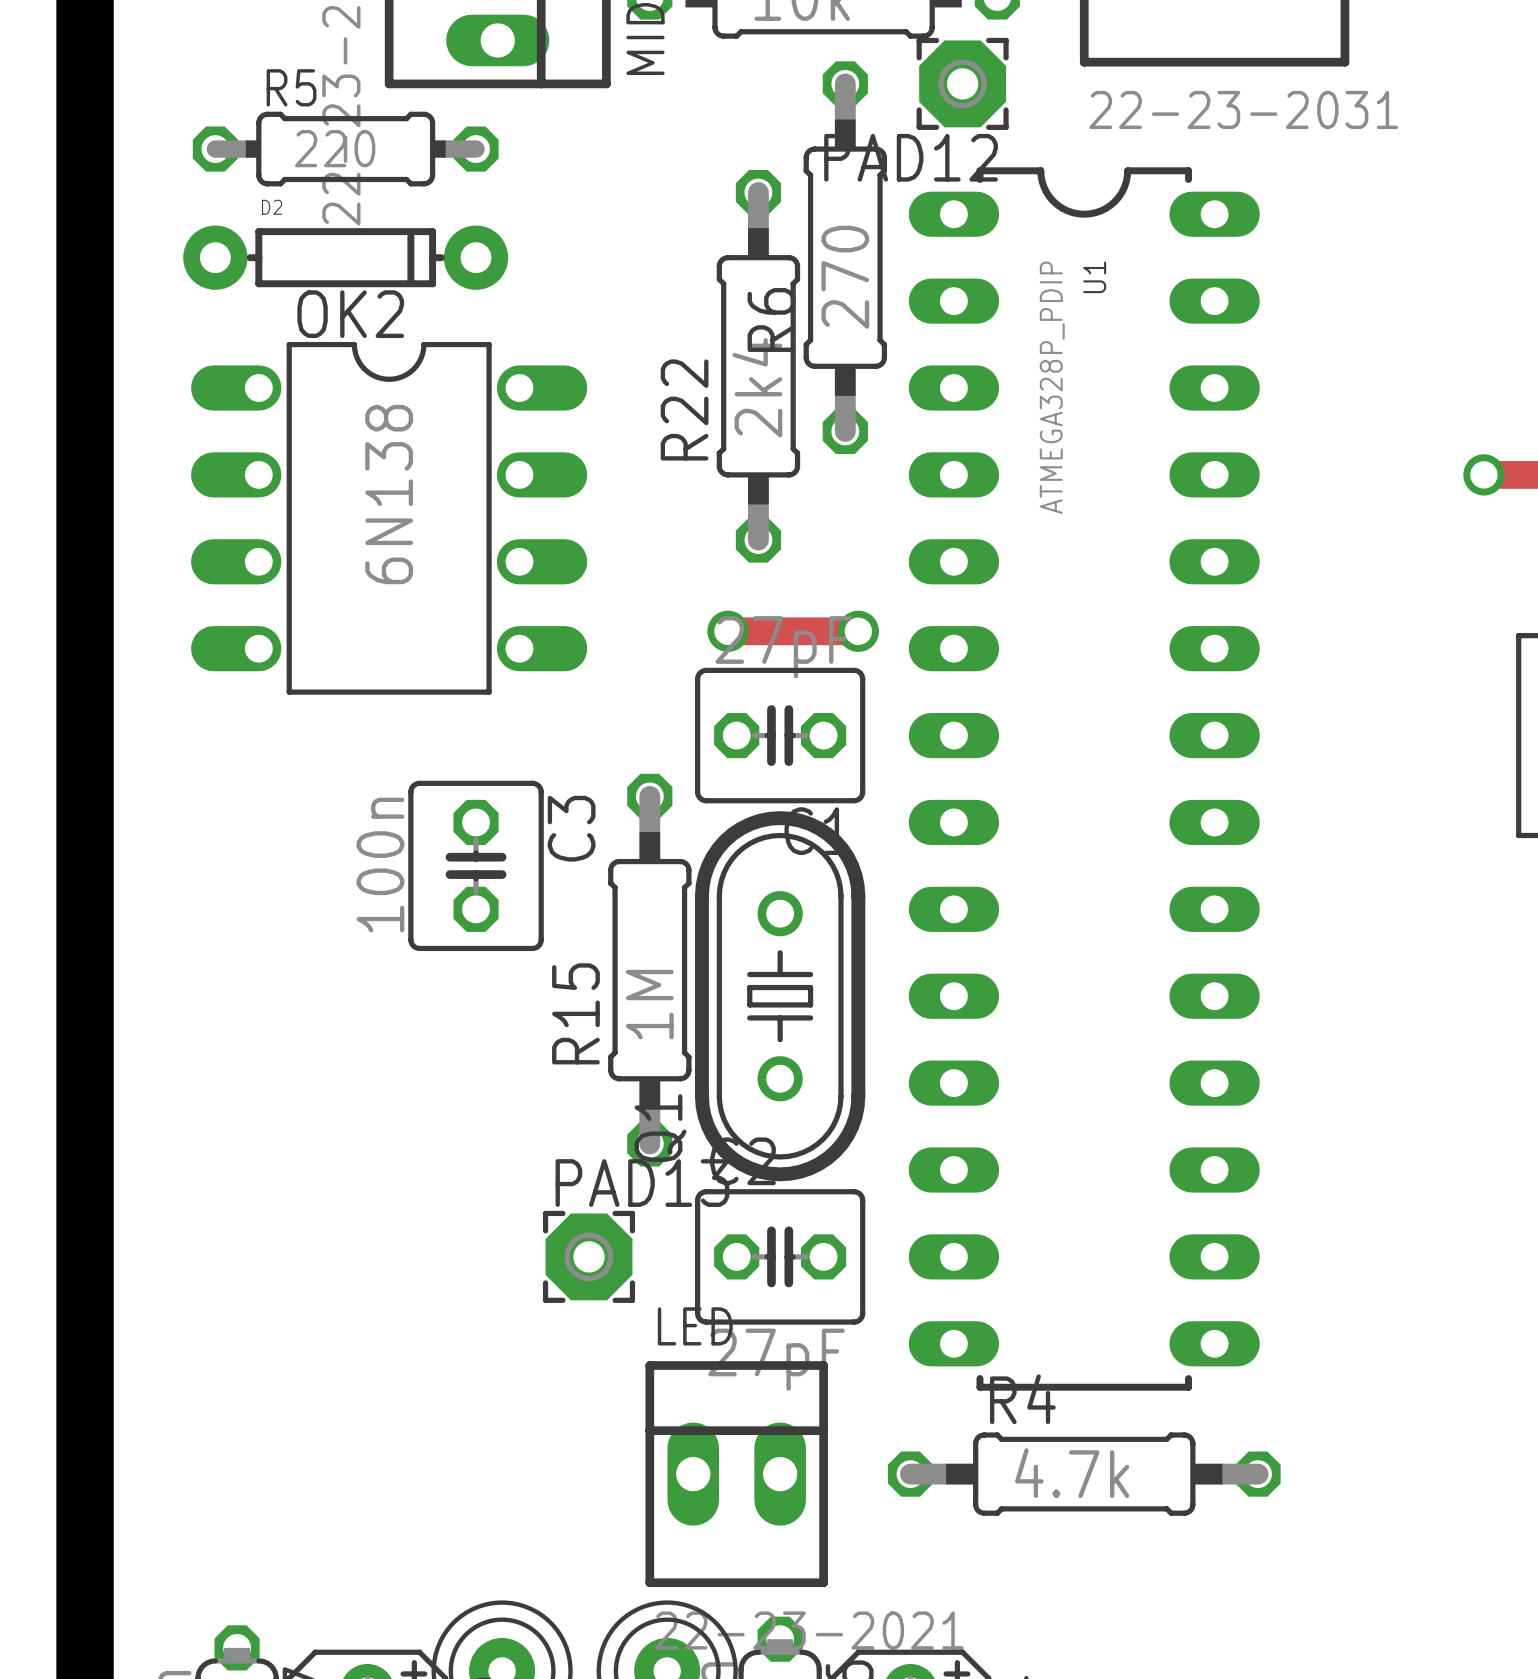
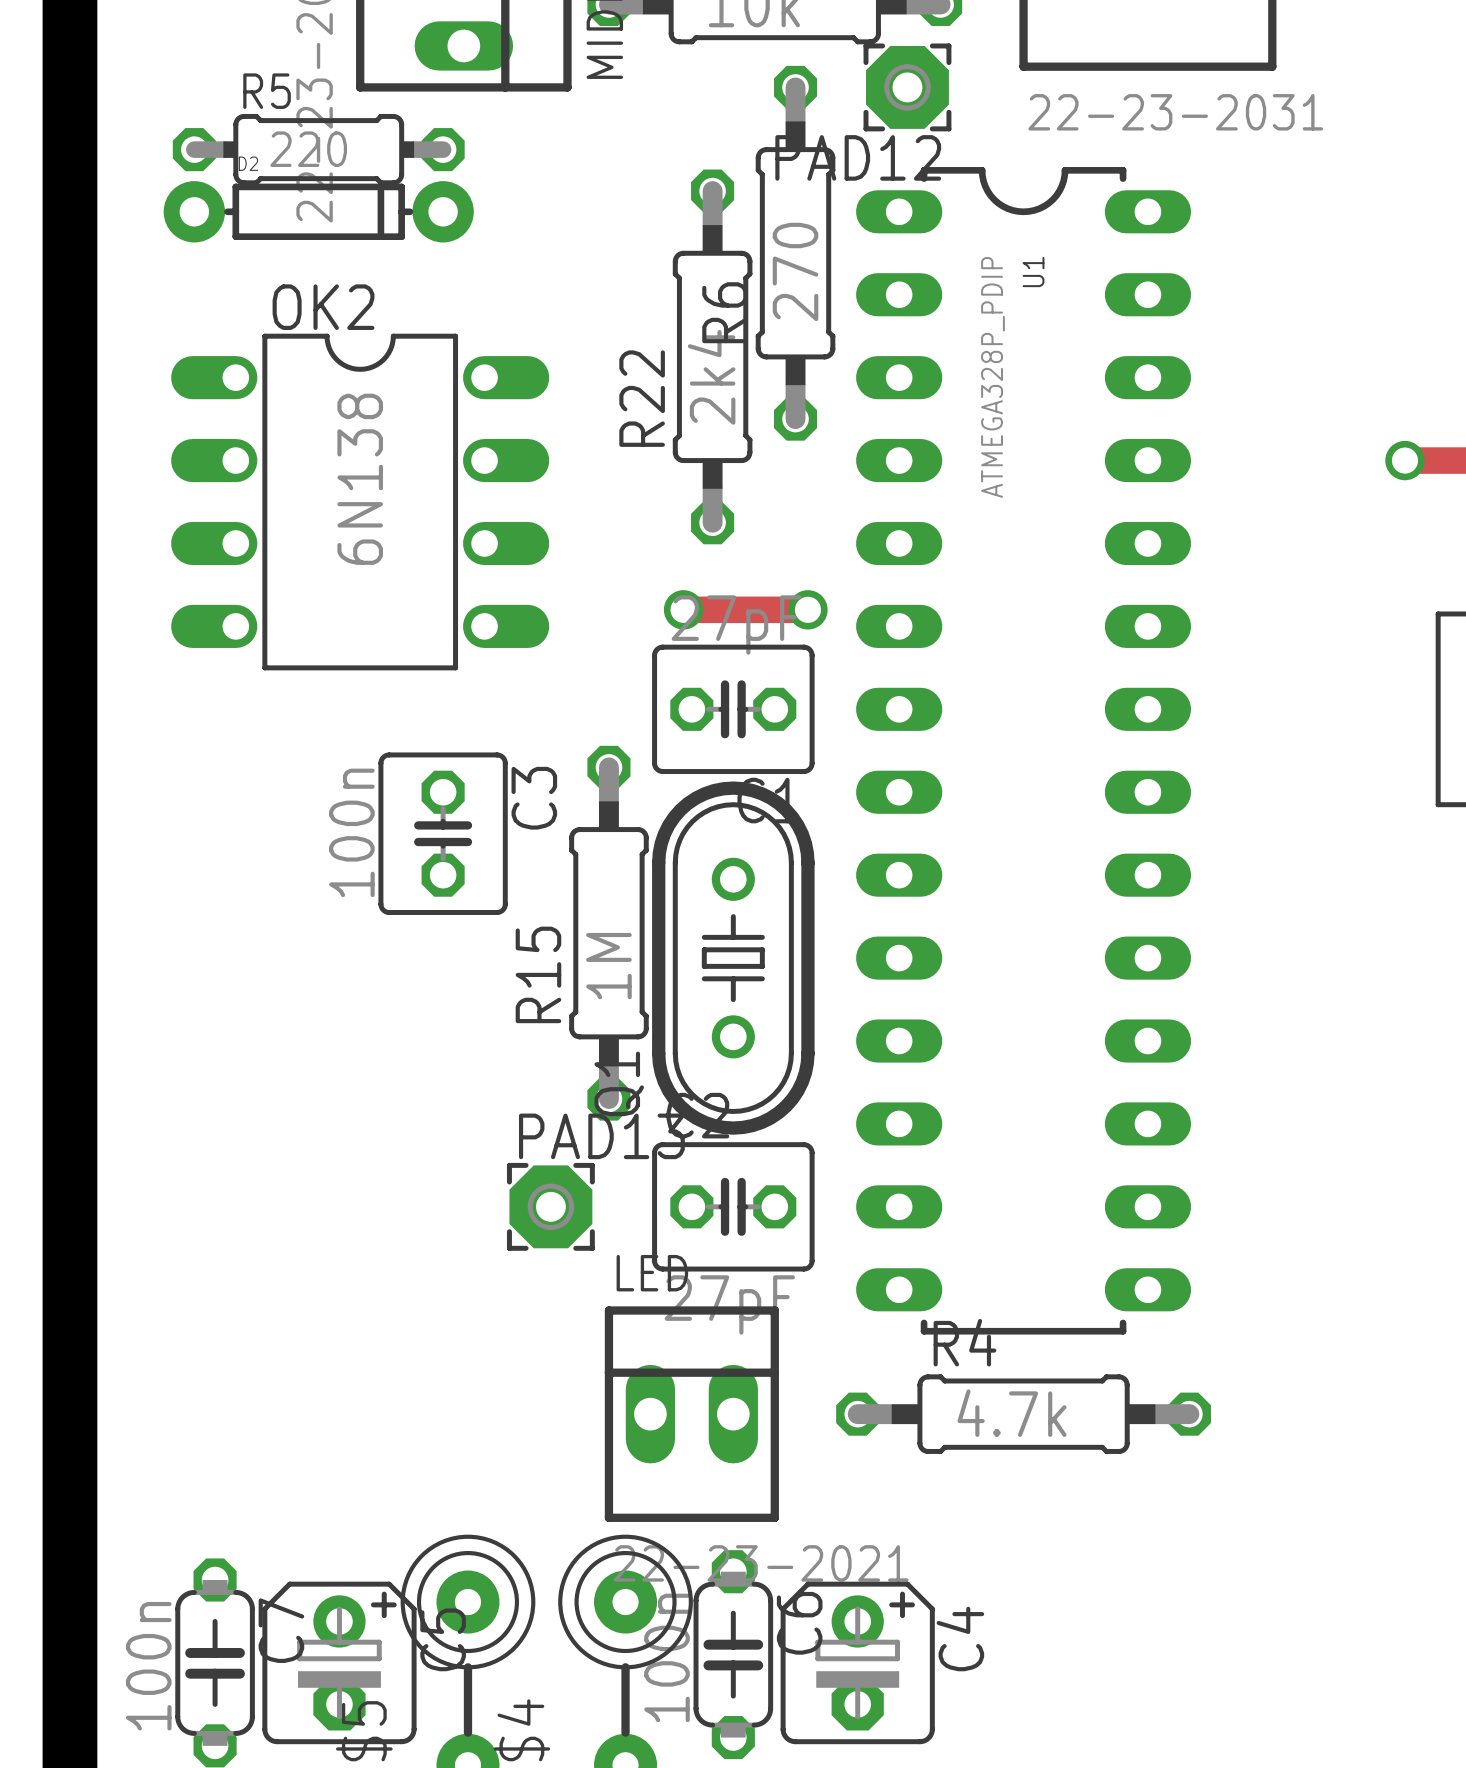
D2 position: (345, 257) -> (318, 211)

